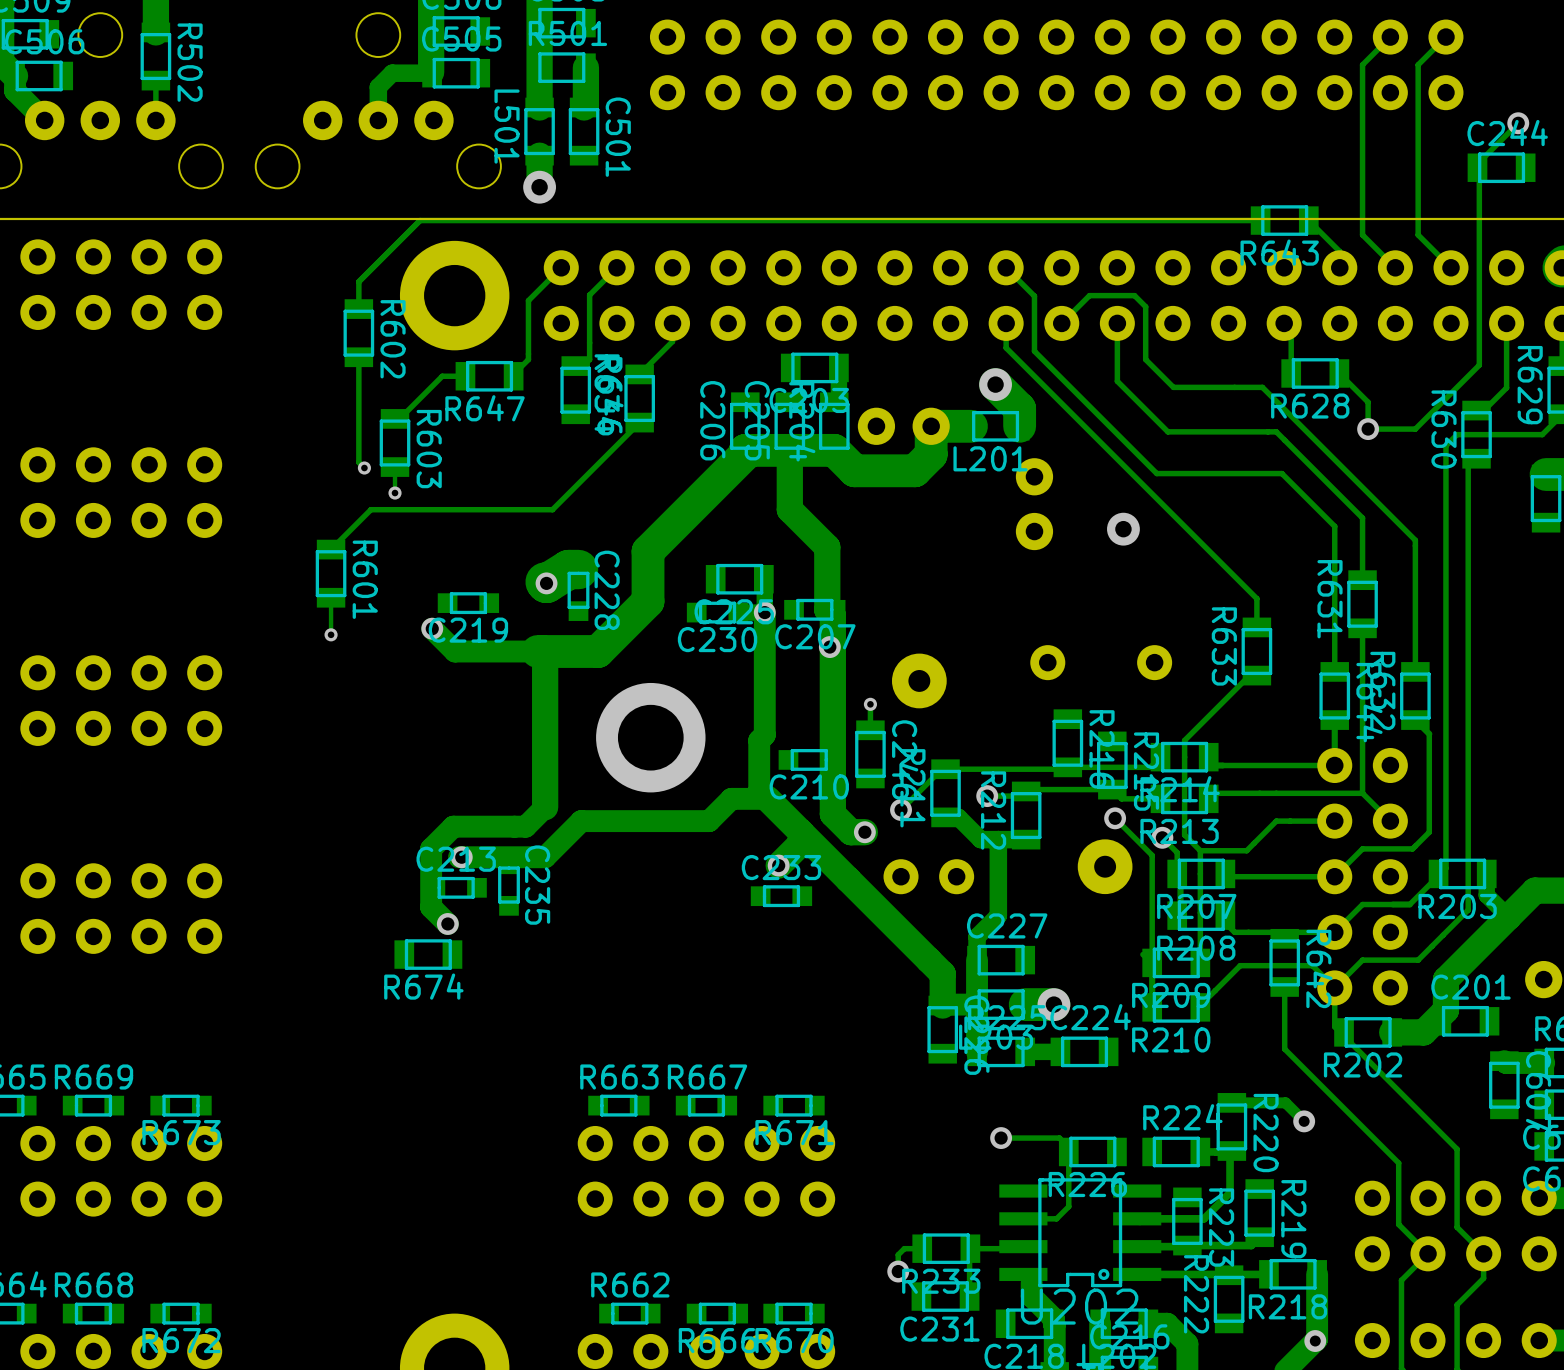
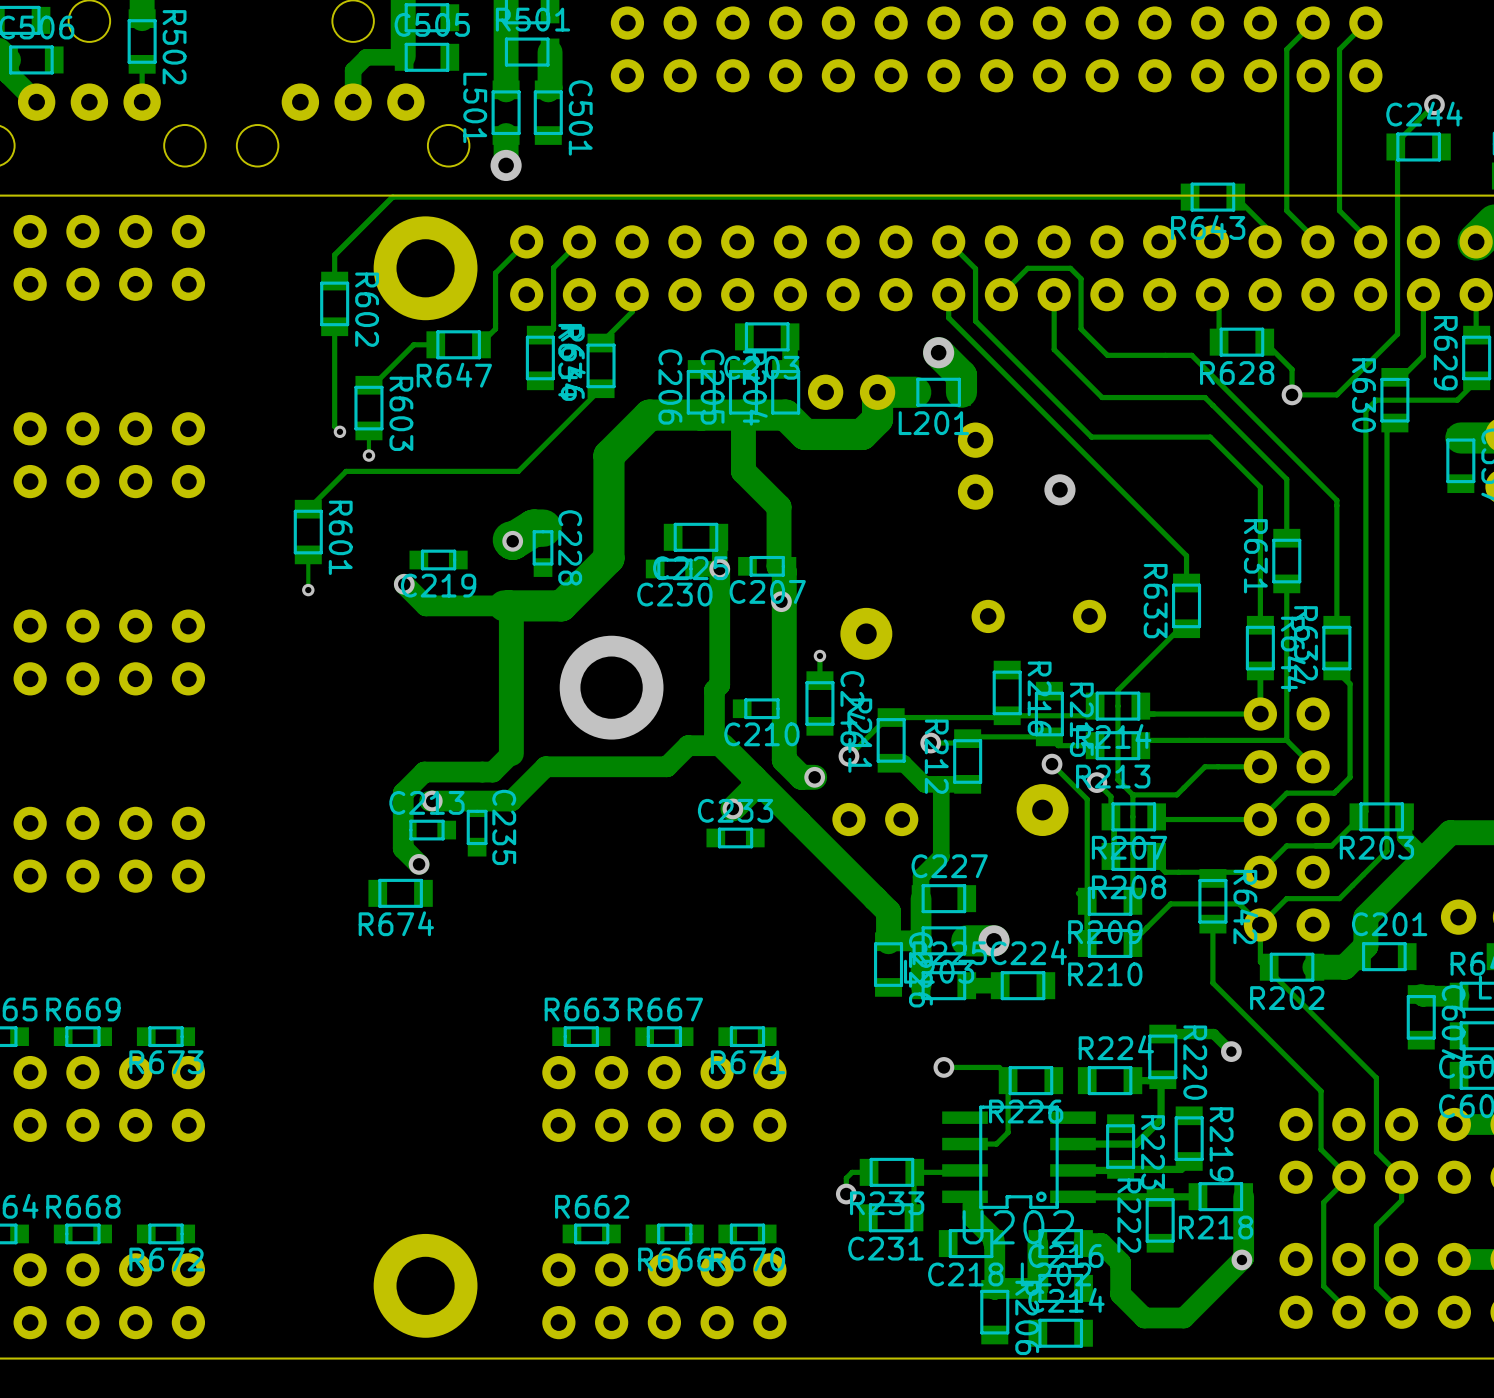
track: (745, 450) (745, 454) (648, 551) -> (701, 415) (649, 415) (608, 455) (608, 510)

